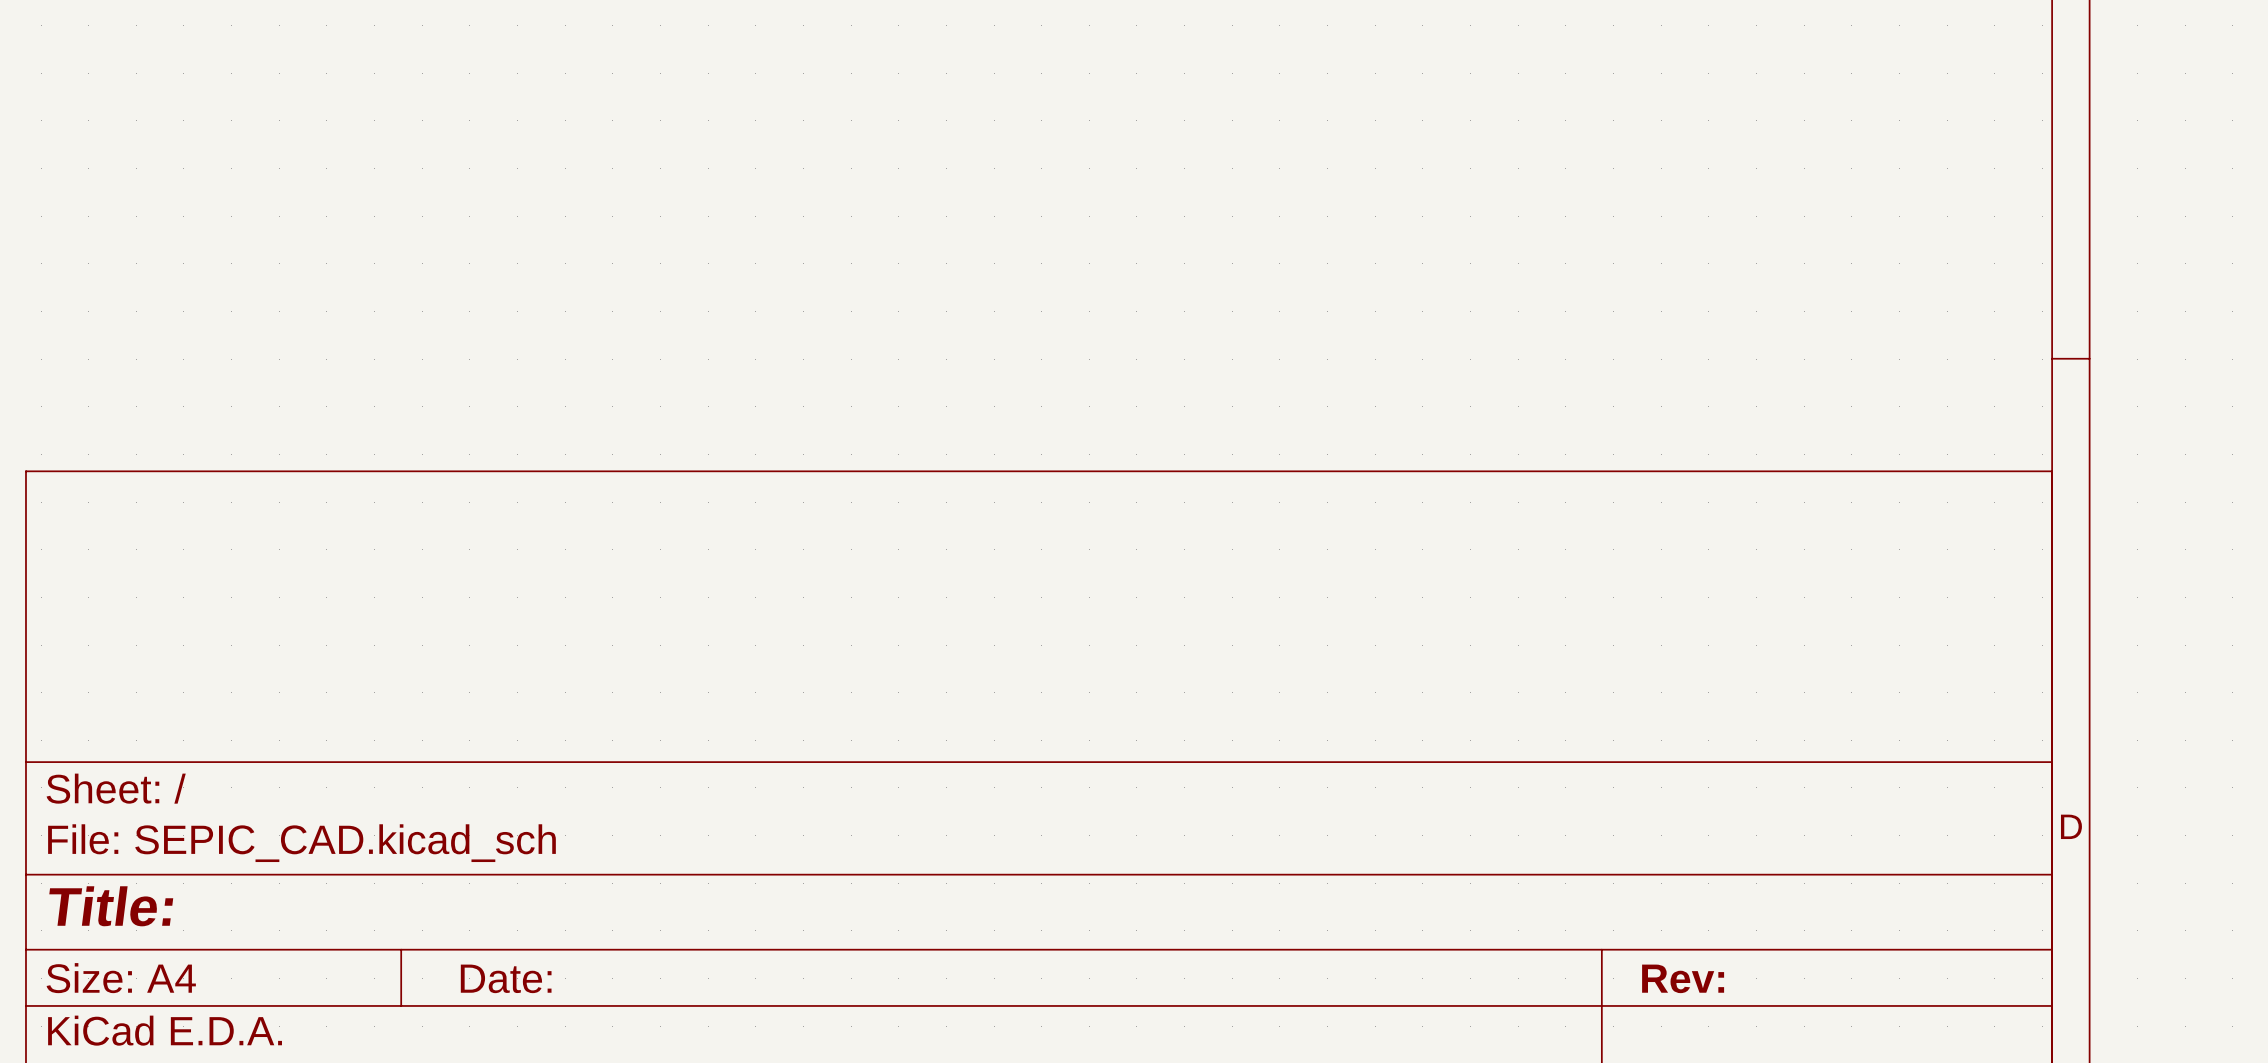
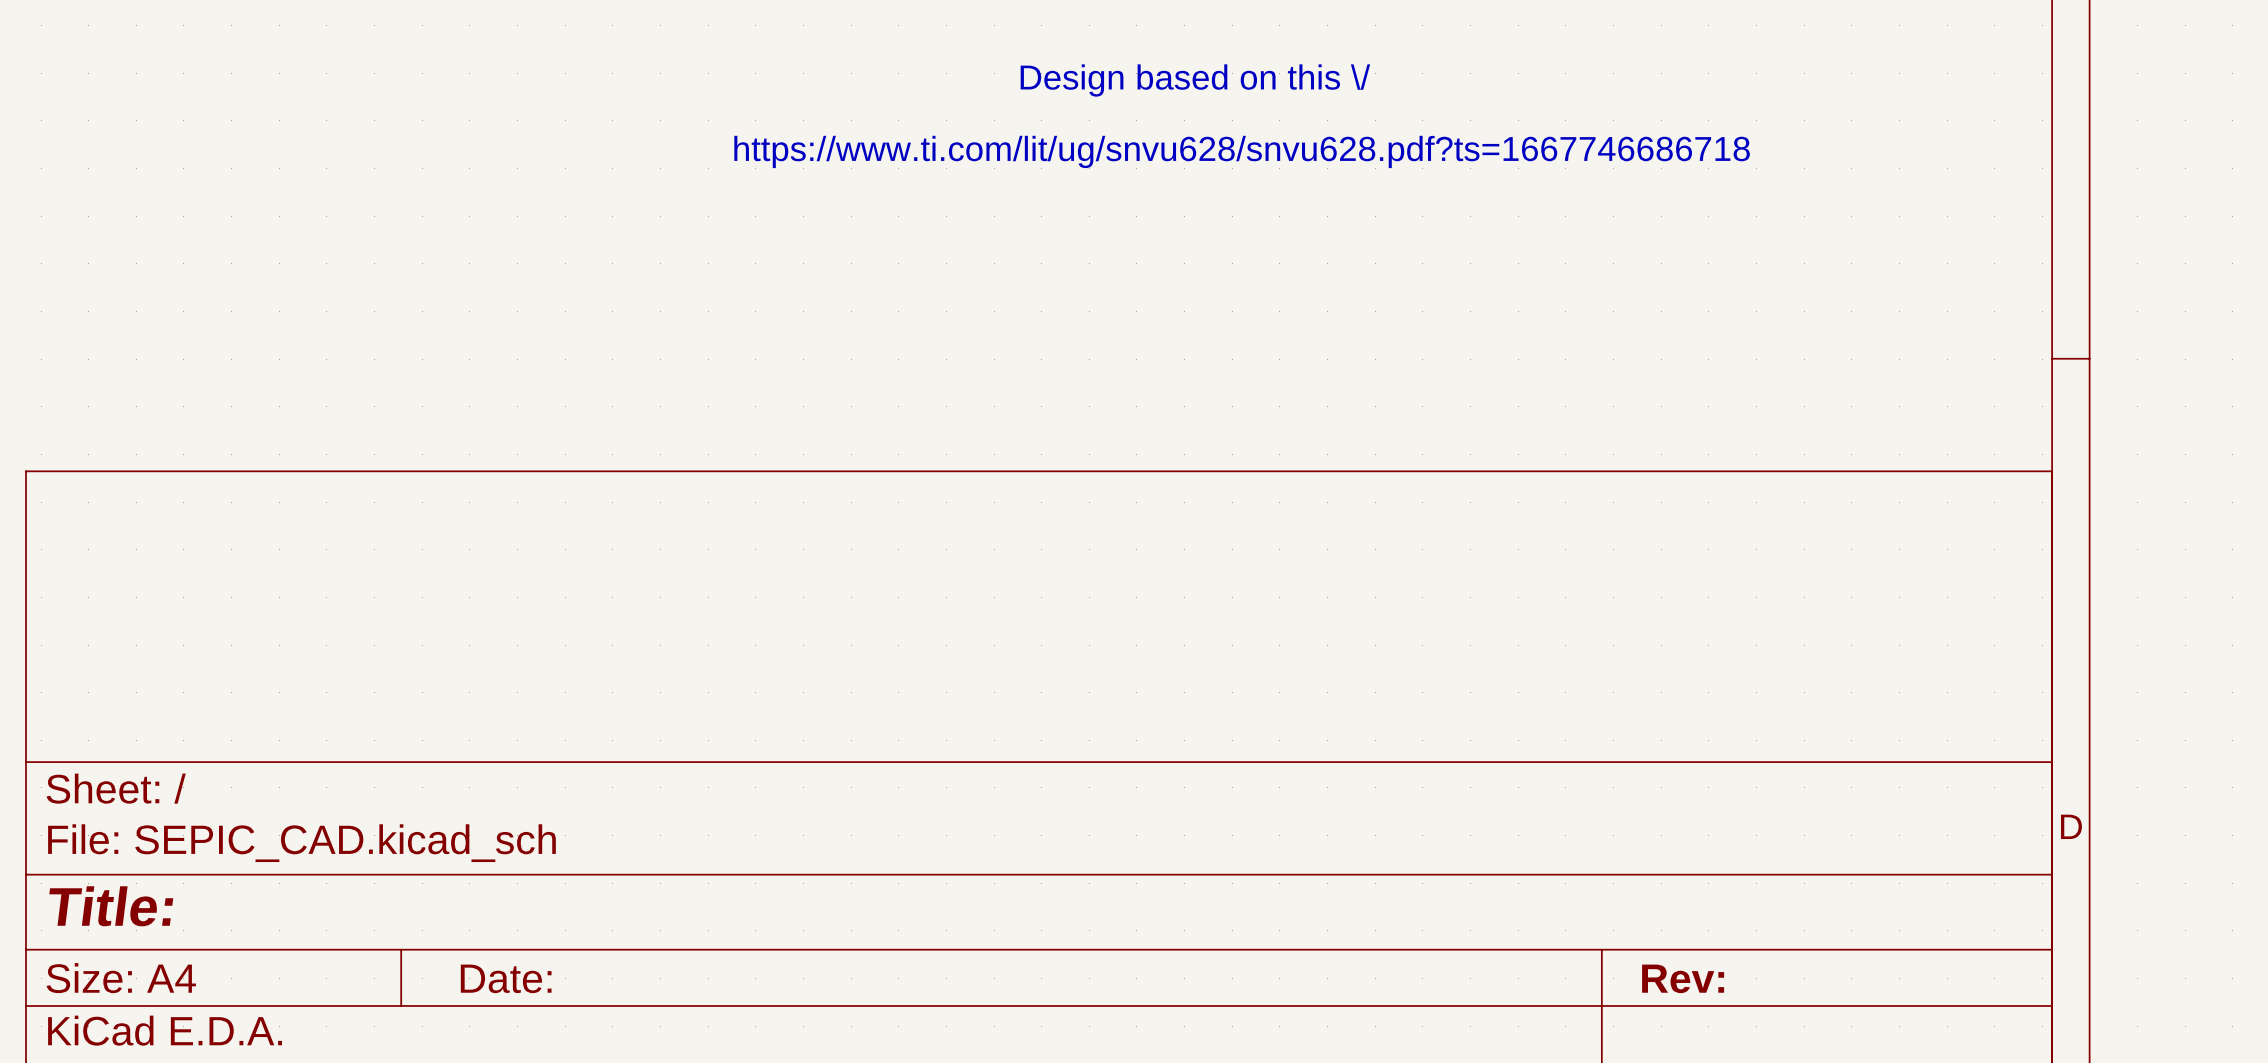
text: none -> Design based on this \/ (1195, 80)
text: none -> https://www.ti.com/lit/ug/snvu628/snvu628.pdf?ts=1667746686718 (1242, 151)

